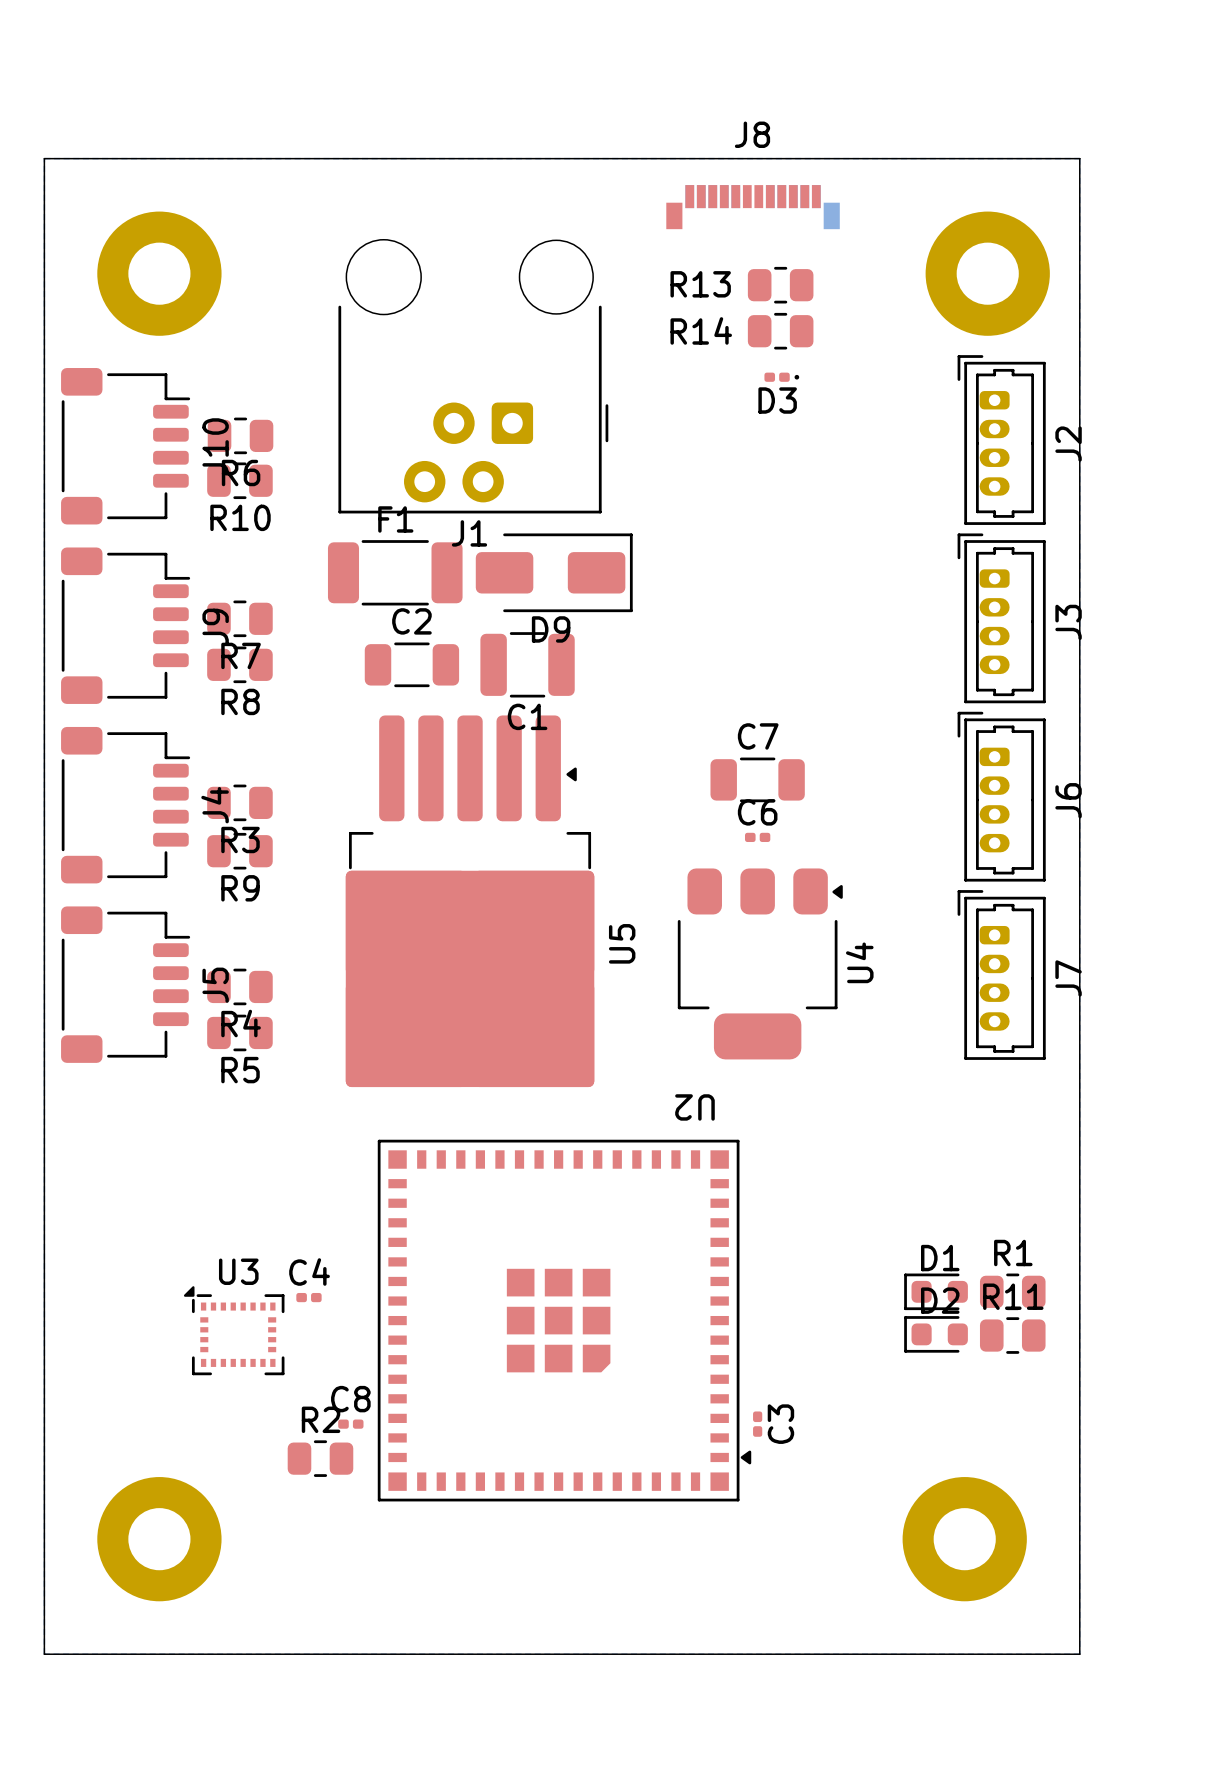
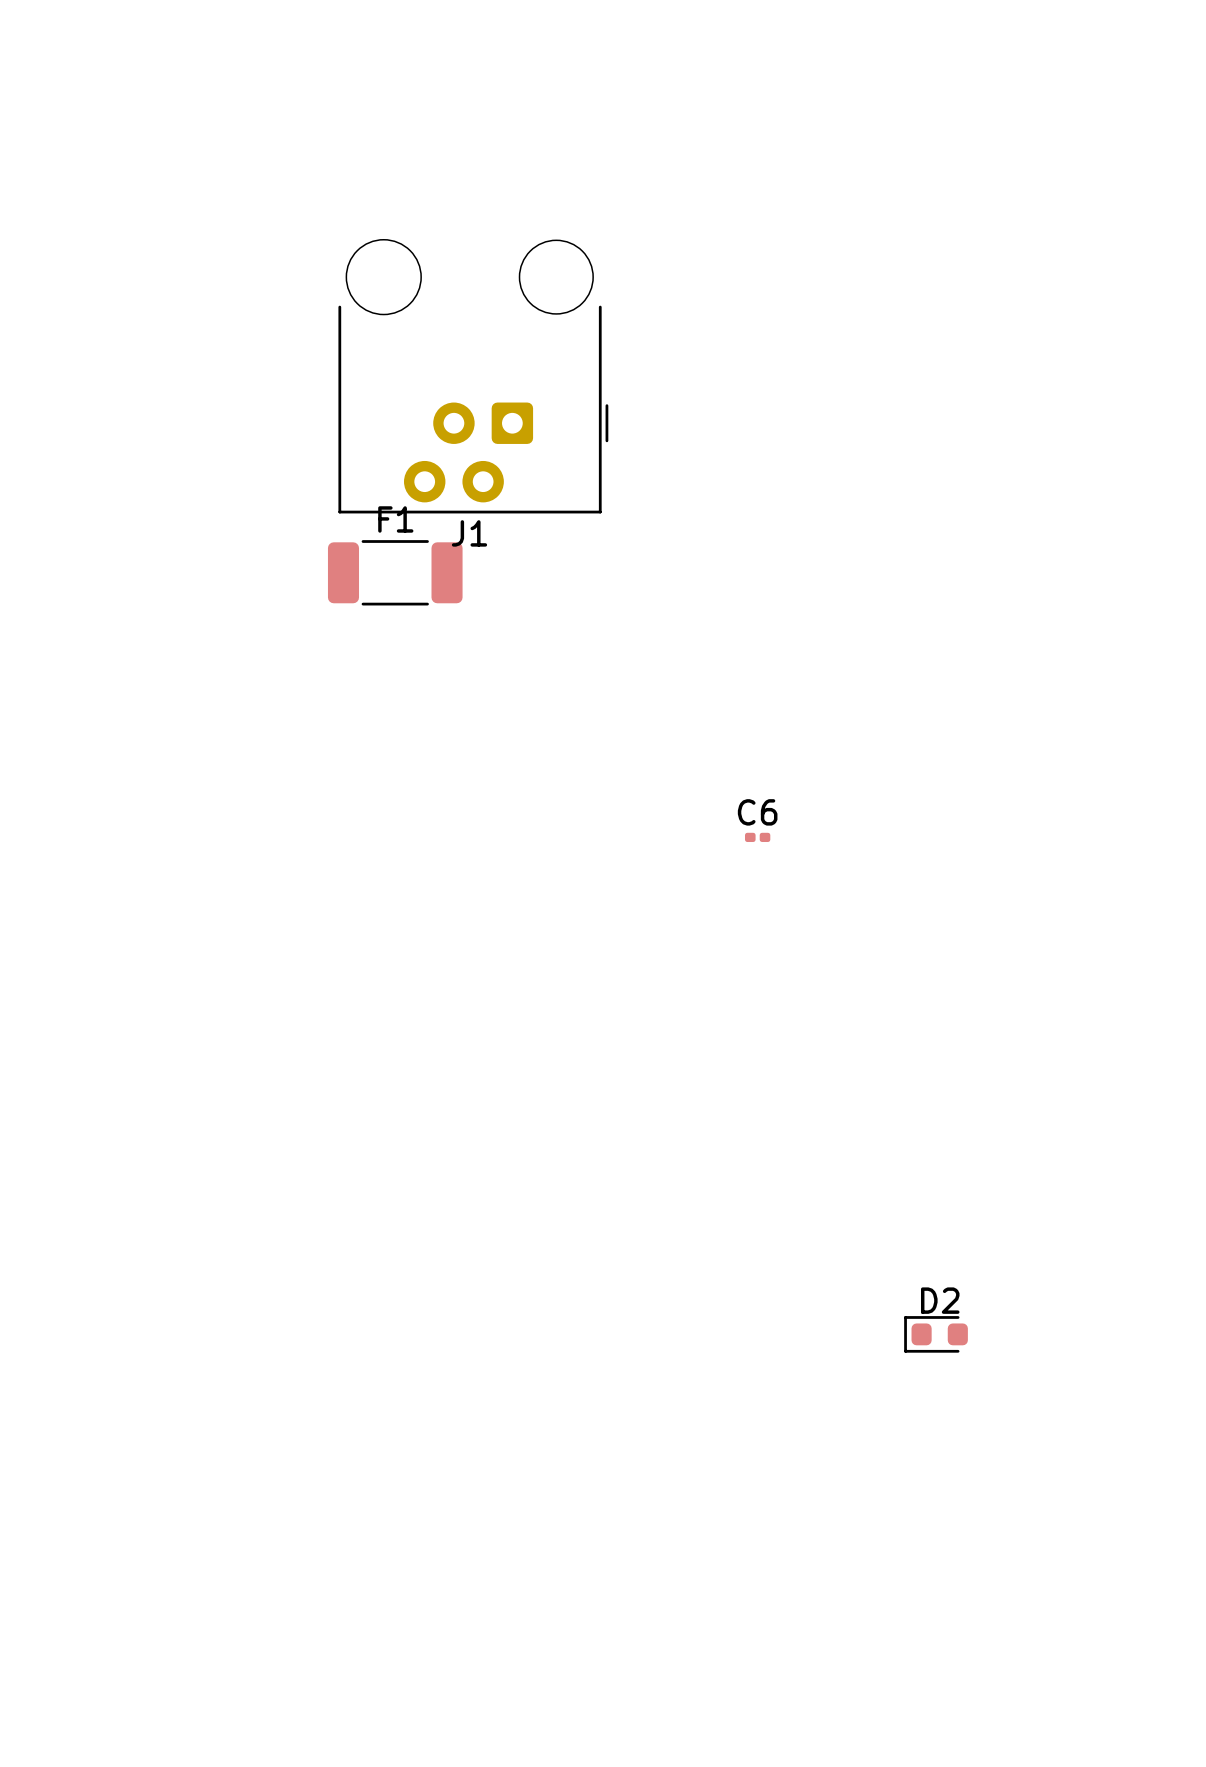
board edge: (44, 158) (1079, 158) (1079, 1654) (44, 1654) (44, 158) -> none
J8: (753, 207) -> none
part: (159, 273) -> none
part: (987, 273) -> none
R13: (780, 285) -> none
R14: (780, 331) -> none
D3: (781, 377) -> none
R6: (240, 435) -> none
J2: (1001, 440) -> none
J10: (125, 446) -> none
R10: (239, 480) -> none
D9: (554, 572) -> none
R7: (239, 618) -> none
J3: (1001, 618) -> none
J9: (125, 625) -> none
R8: (239, 664) -> none
C2: (411, 664) -> none
C1: (527, 664) -> none
C7: (757, 779) -> none
J6: (1001, 796) -> none
R3: (239, 802) -> none
J4: (125, 805) -> none
R9: (239, 851) -> none
U5: (470, 901) -> none
U4: (760, 963) -> none
J7: (1001, 974) -> none
J5: (125, 984) -> none
R4: (239, 986) -> none
R5: (239, 1032) -> none
D1: (936, 1291) -> none
R1: (1012, 1291) -> none
C4: (308, 1297) -> none
U2: (564, 1320) -> none
U3: (234, 1330) -> none
R11: (1012, 1335) -> none
C8: (350, 1424) -> none
C3: (757, 1424) -> none
R2: (320, 1458) -> none
part: (159, 1539) -> none
part: (964, 1539) -> none

